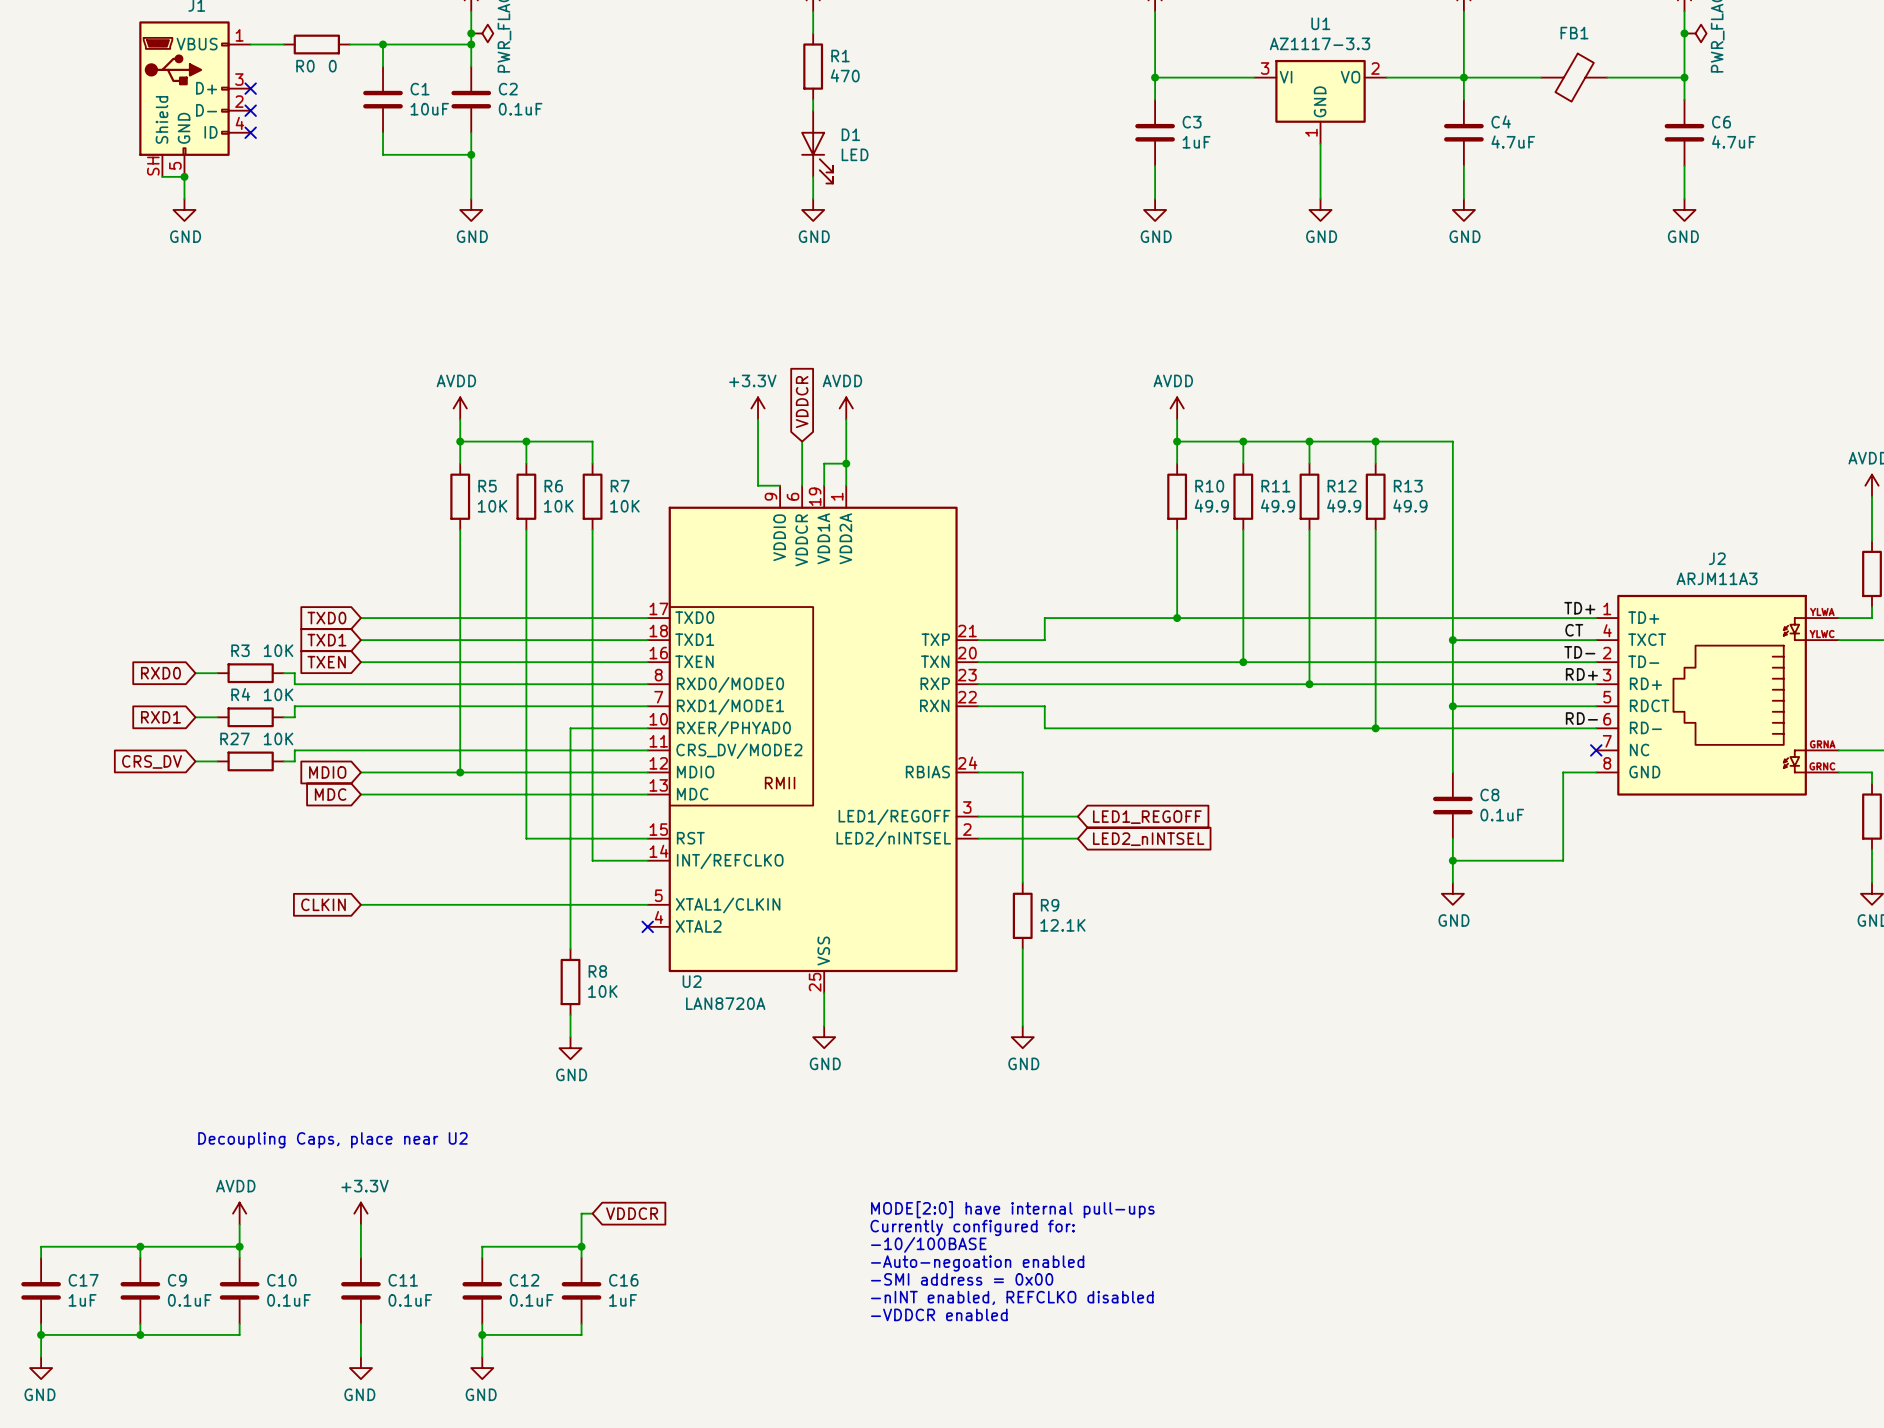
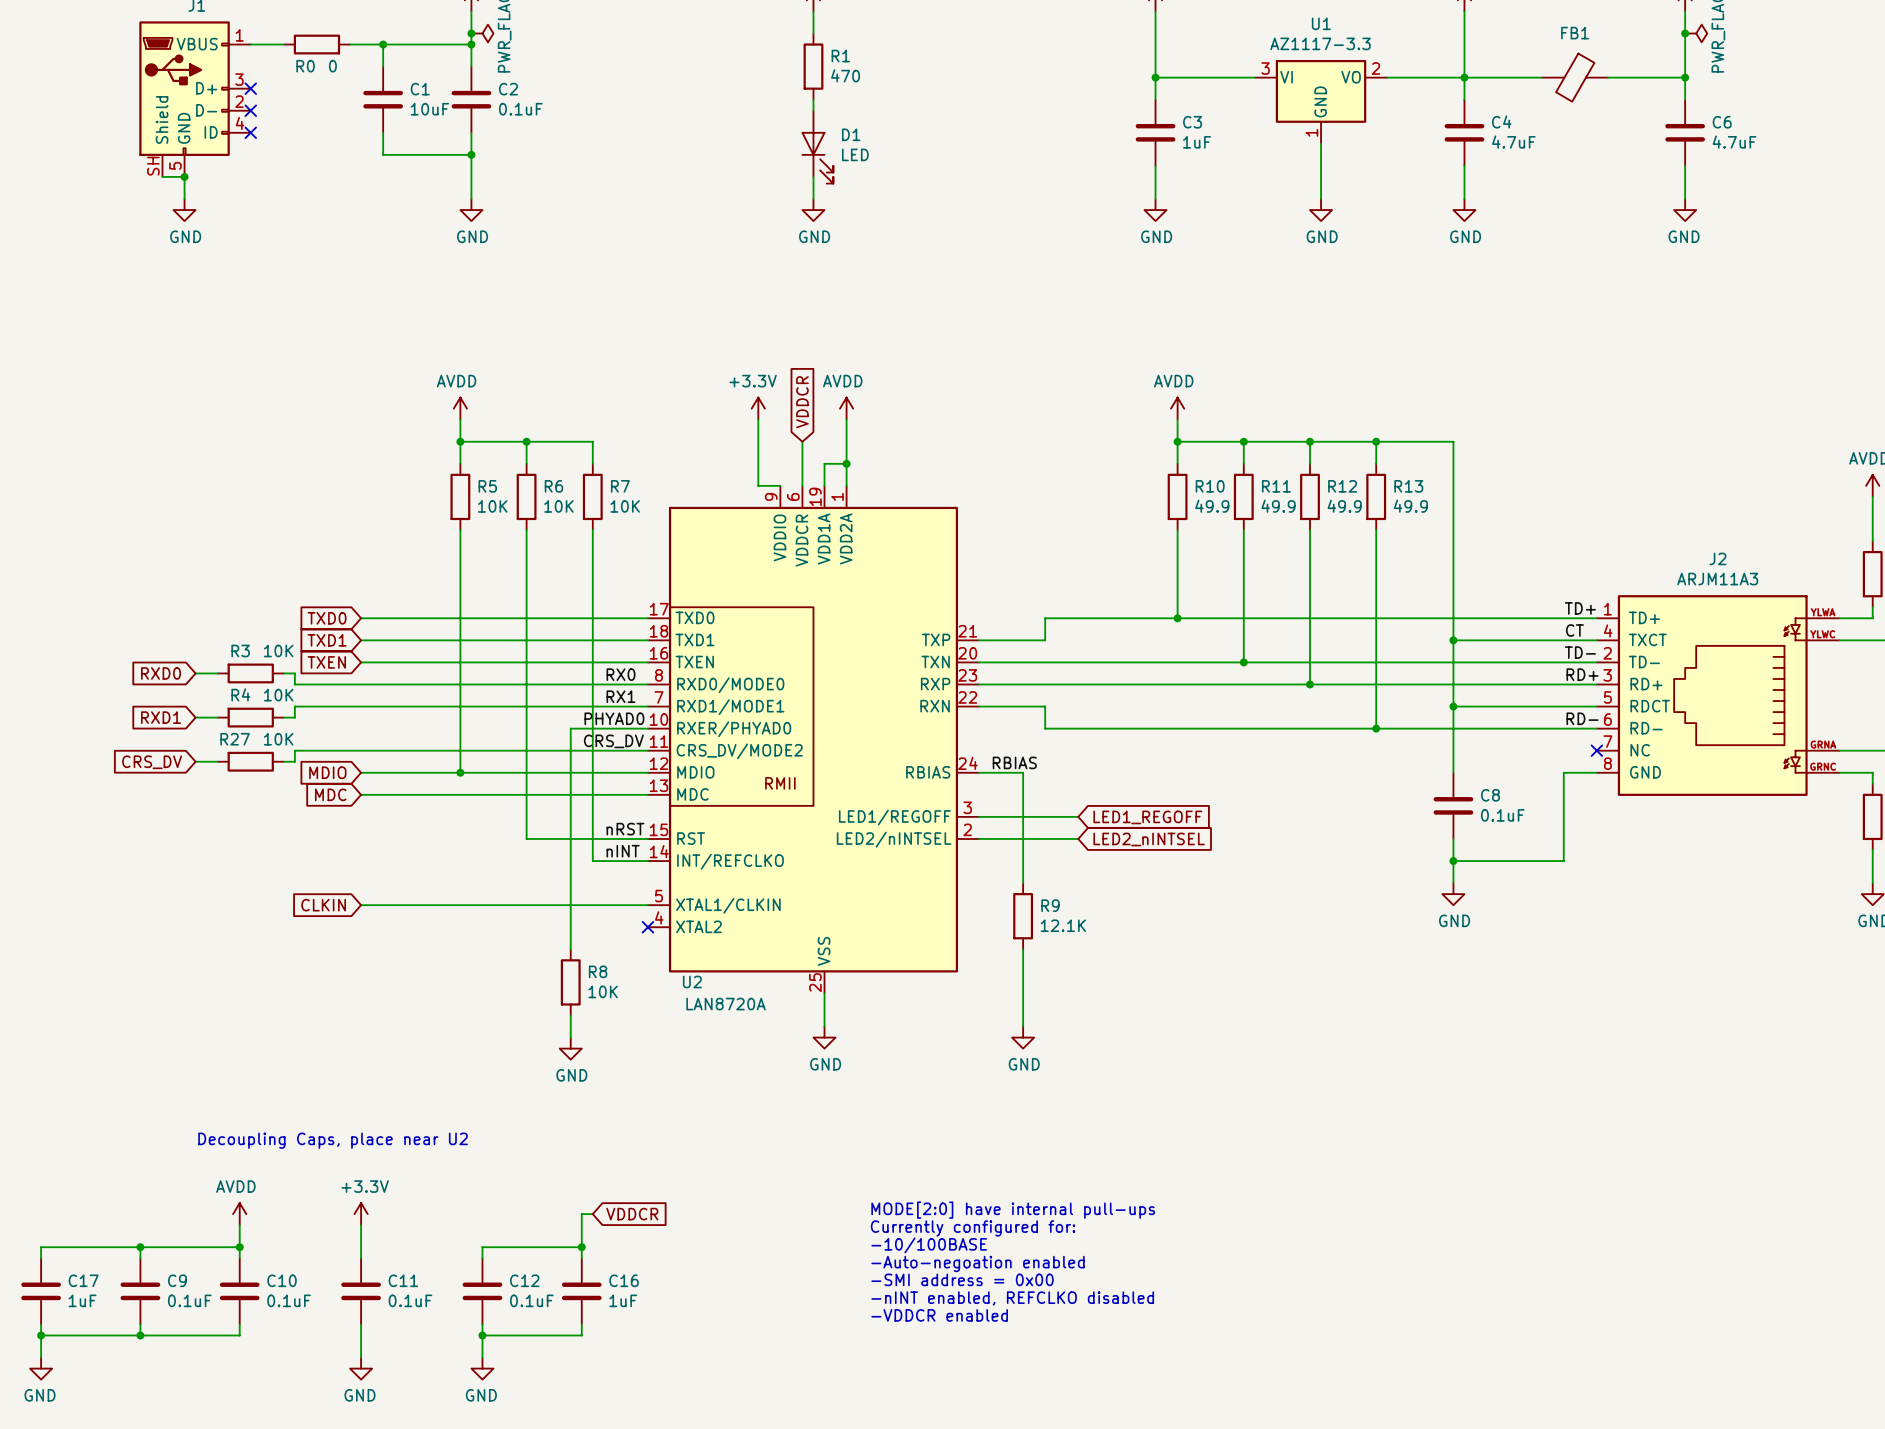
label: none -> RX0 (620, 674)
label: none -> RX1 (620, 696)
label: none -> PHYAD0 (614, 718)
label: none -> CRS_DV (613, 741)
label: none -> RBIAS (1014, 762)
label: none -> nRST (625, 829)
label: none -> nINT (623, 851)

